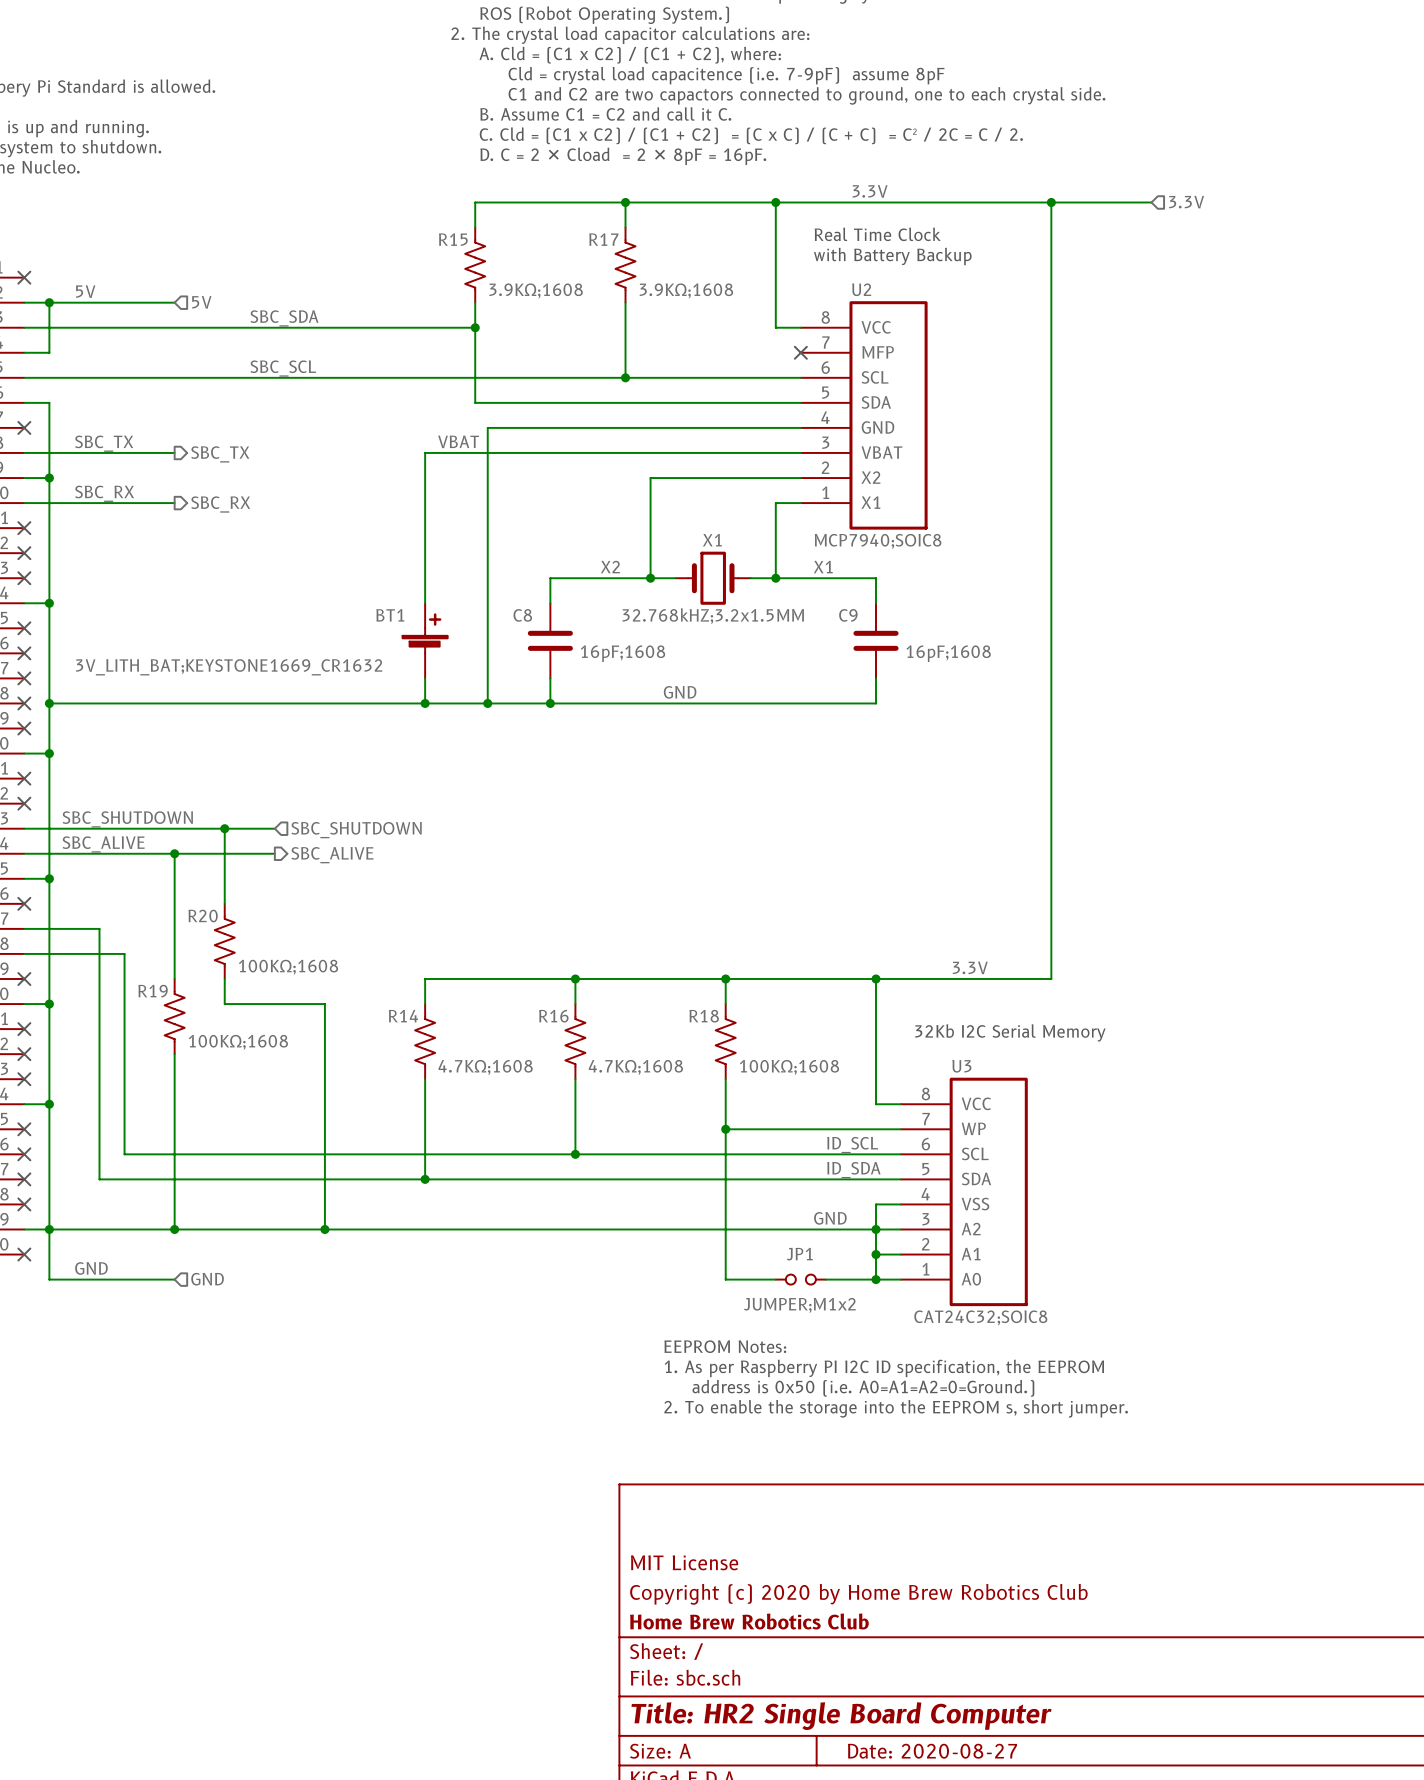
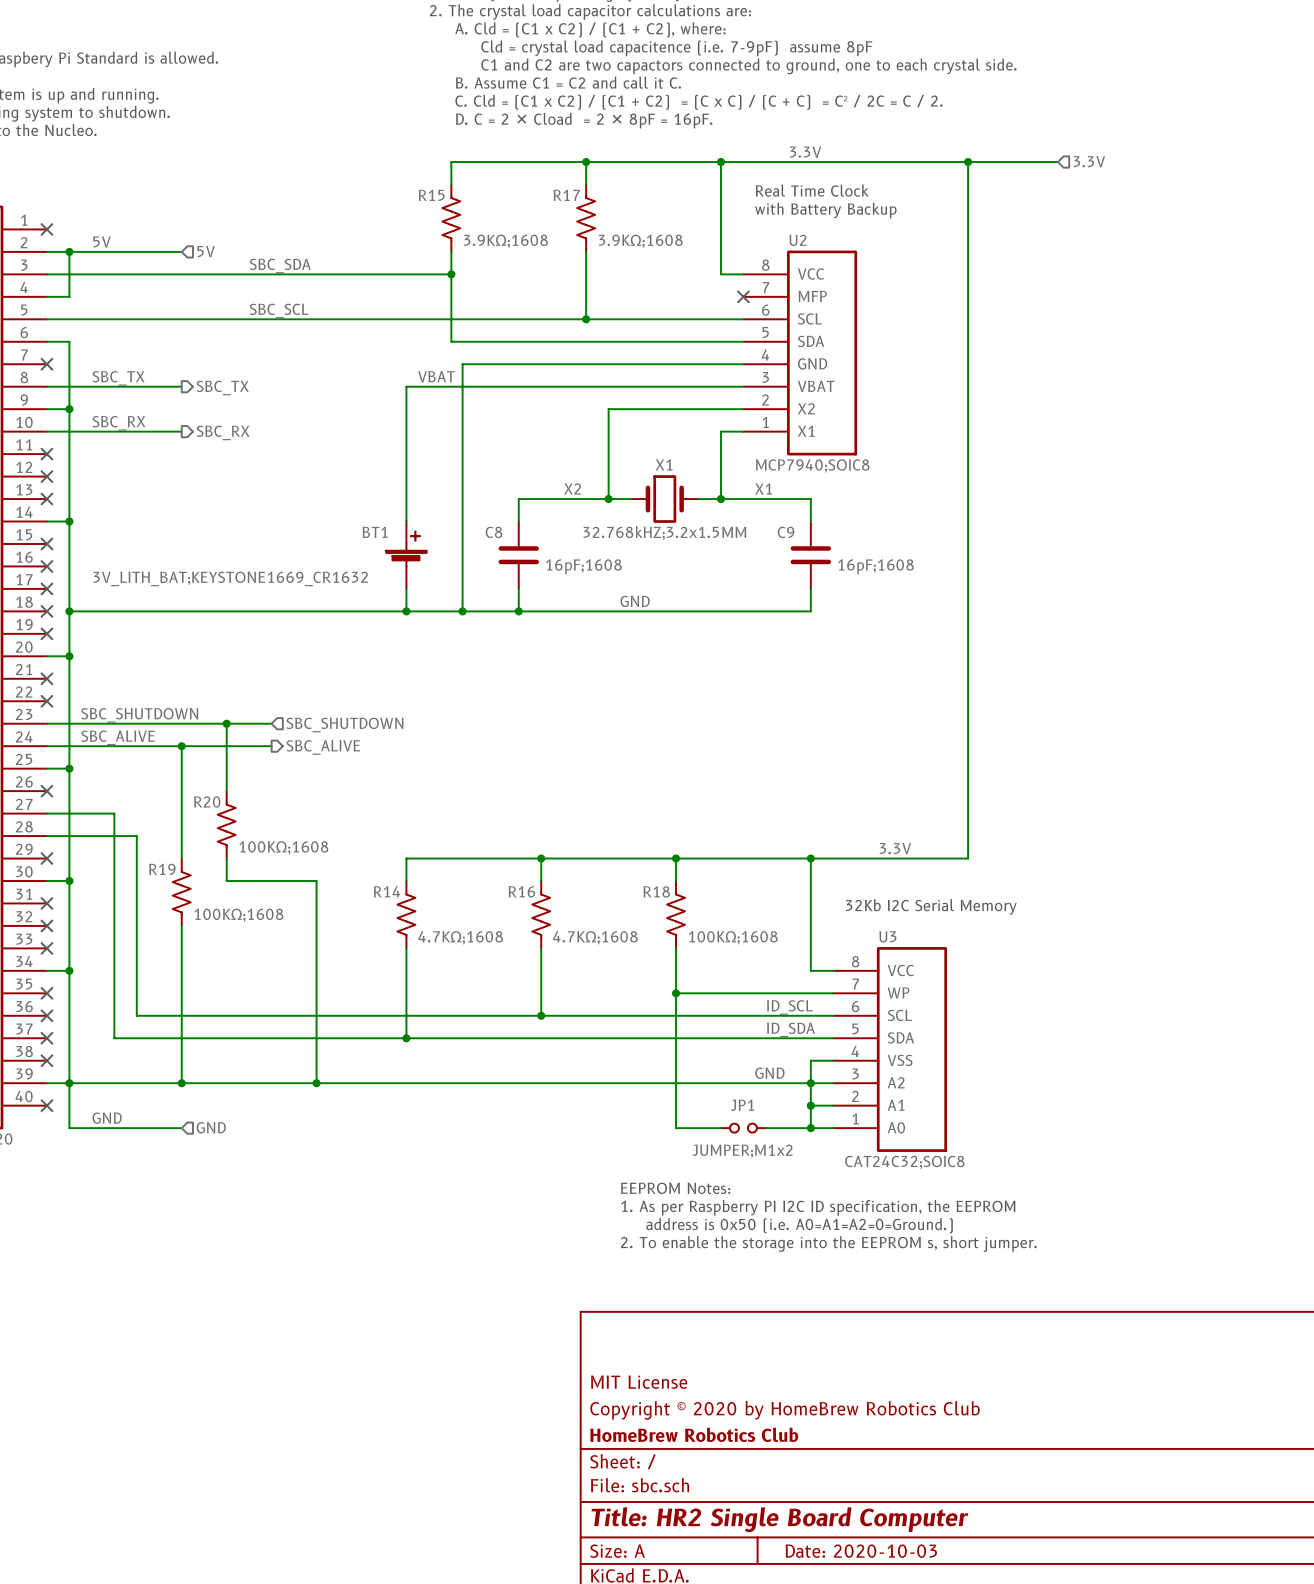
title block: Copyright (c) 2020 by Home Brew Robotics Club (858, 1594) -> Copyright © 2020 by HomeBrew Robotics Club (785, 1410)
title block: Home Brew Robotics Club (749, 1621) -> HomeBrew Robotics Club (694, 1434)
title block: Date: 2020-08-27 (932, 1751) -> Date: 2020-10-03 (861, 1551)

